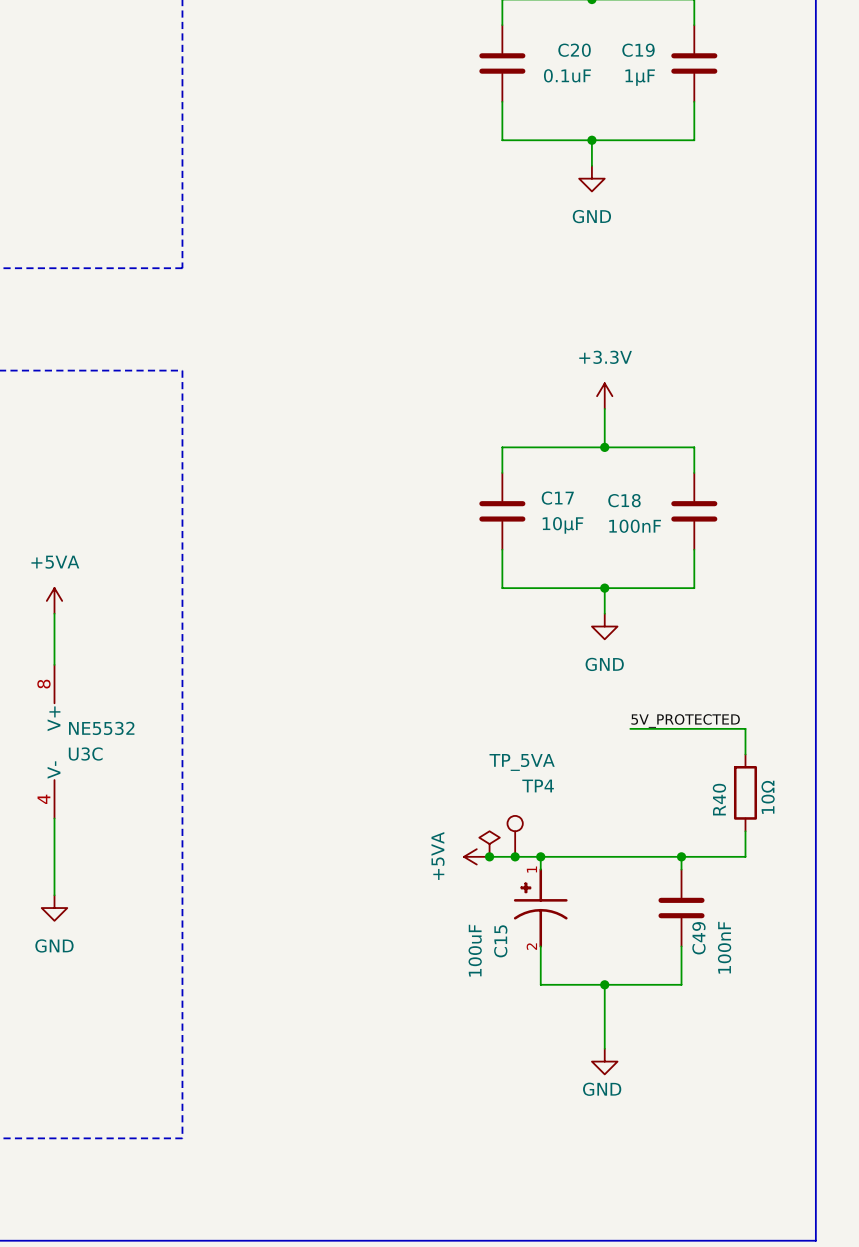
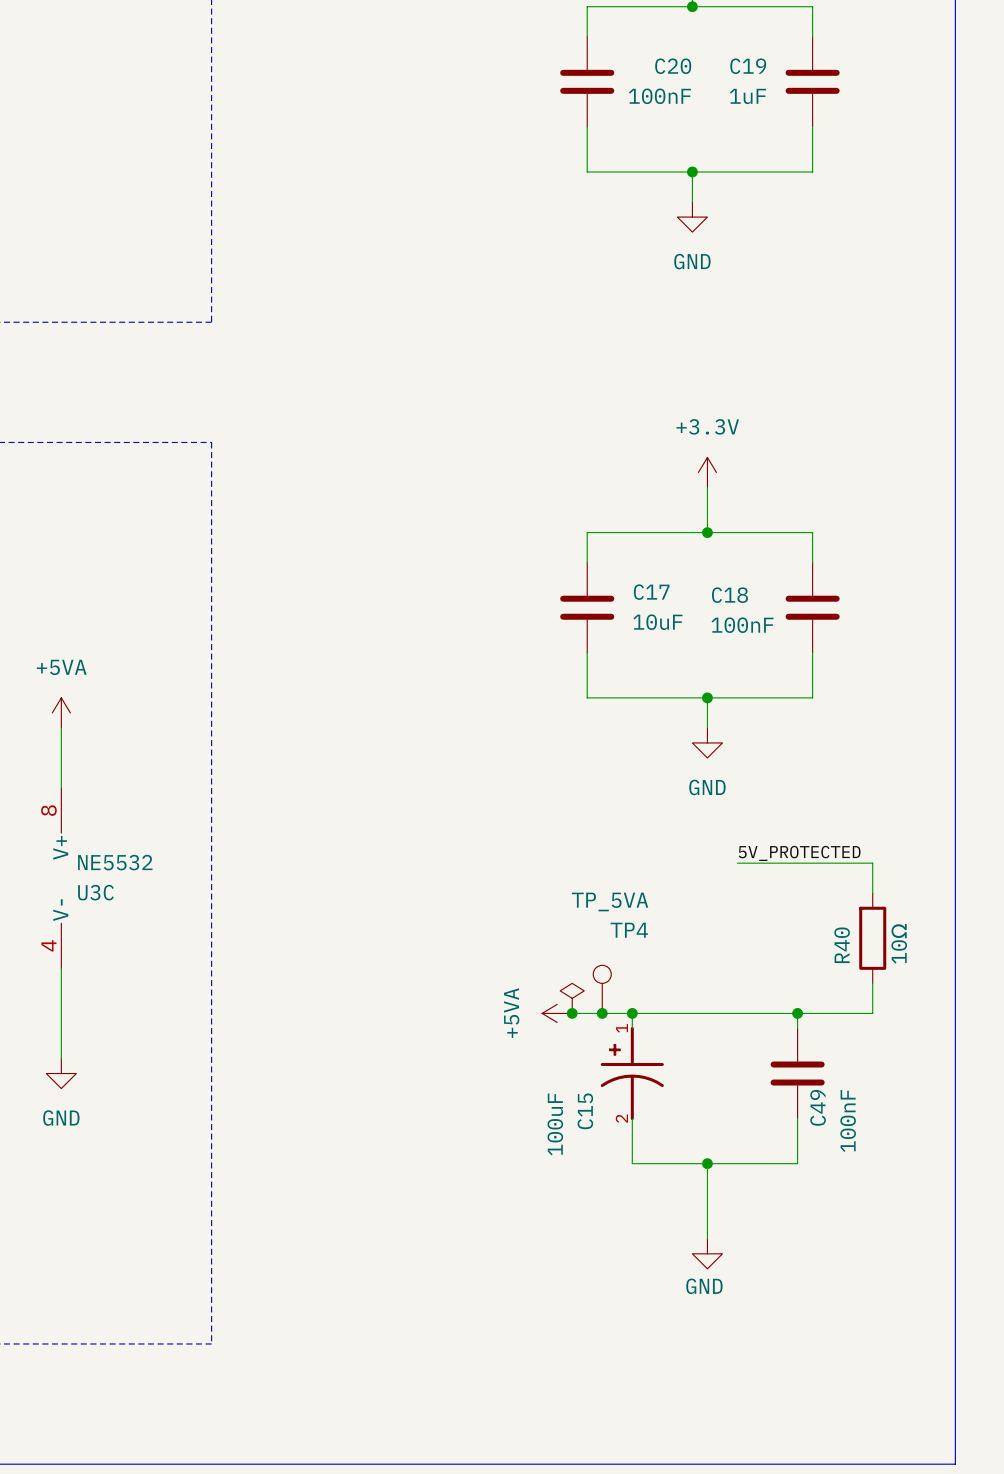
C20 value: 0.1uF (567, 75) -> 100nF (659, 96)
C19 value: 1μF (640, 77) -> 1uF (747, 96)
C17 value: 10μF (563, 525) -> 10uF (657, 622)

